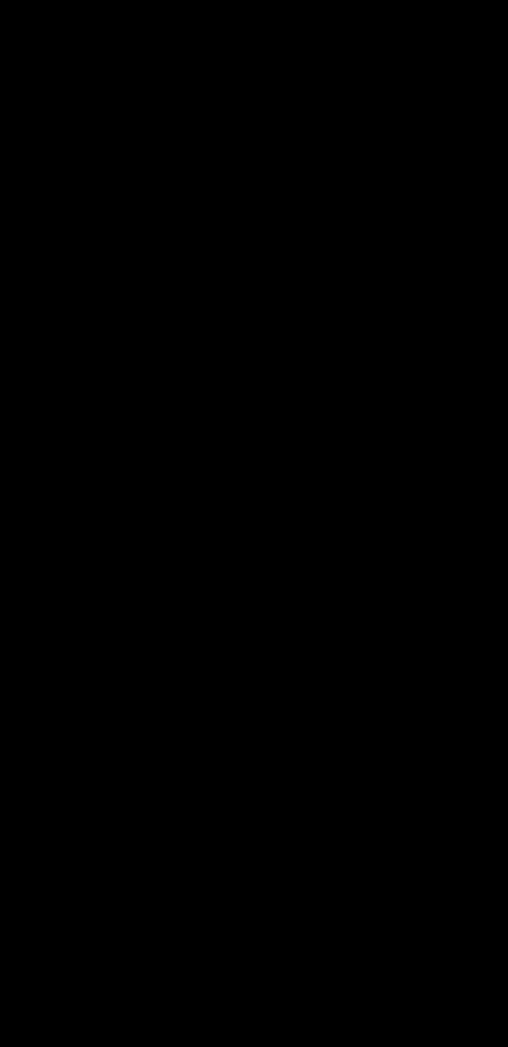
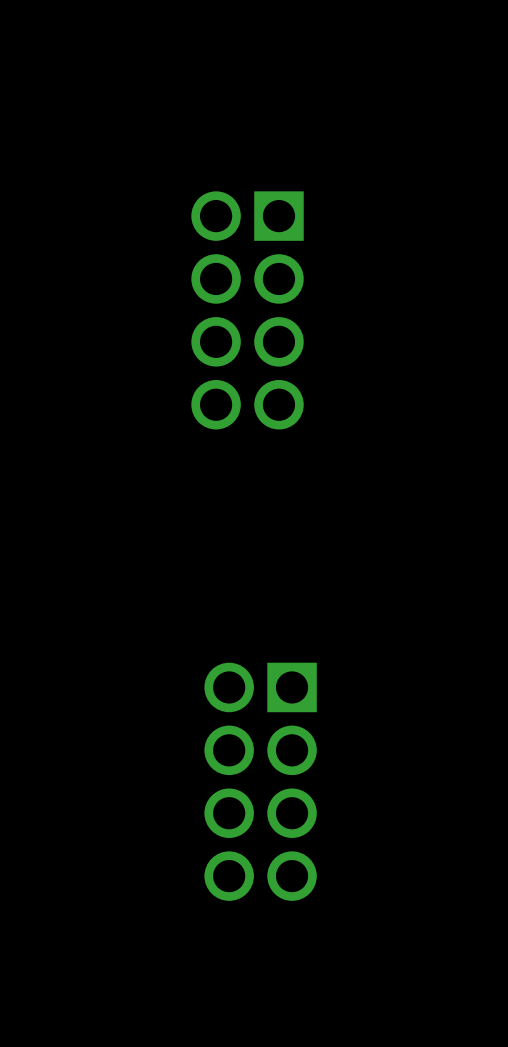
part: none -> (247, 310)
part: none -> (260, 781)

